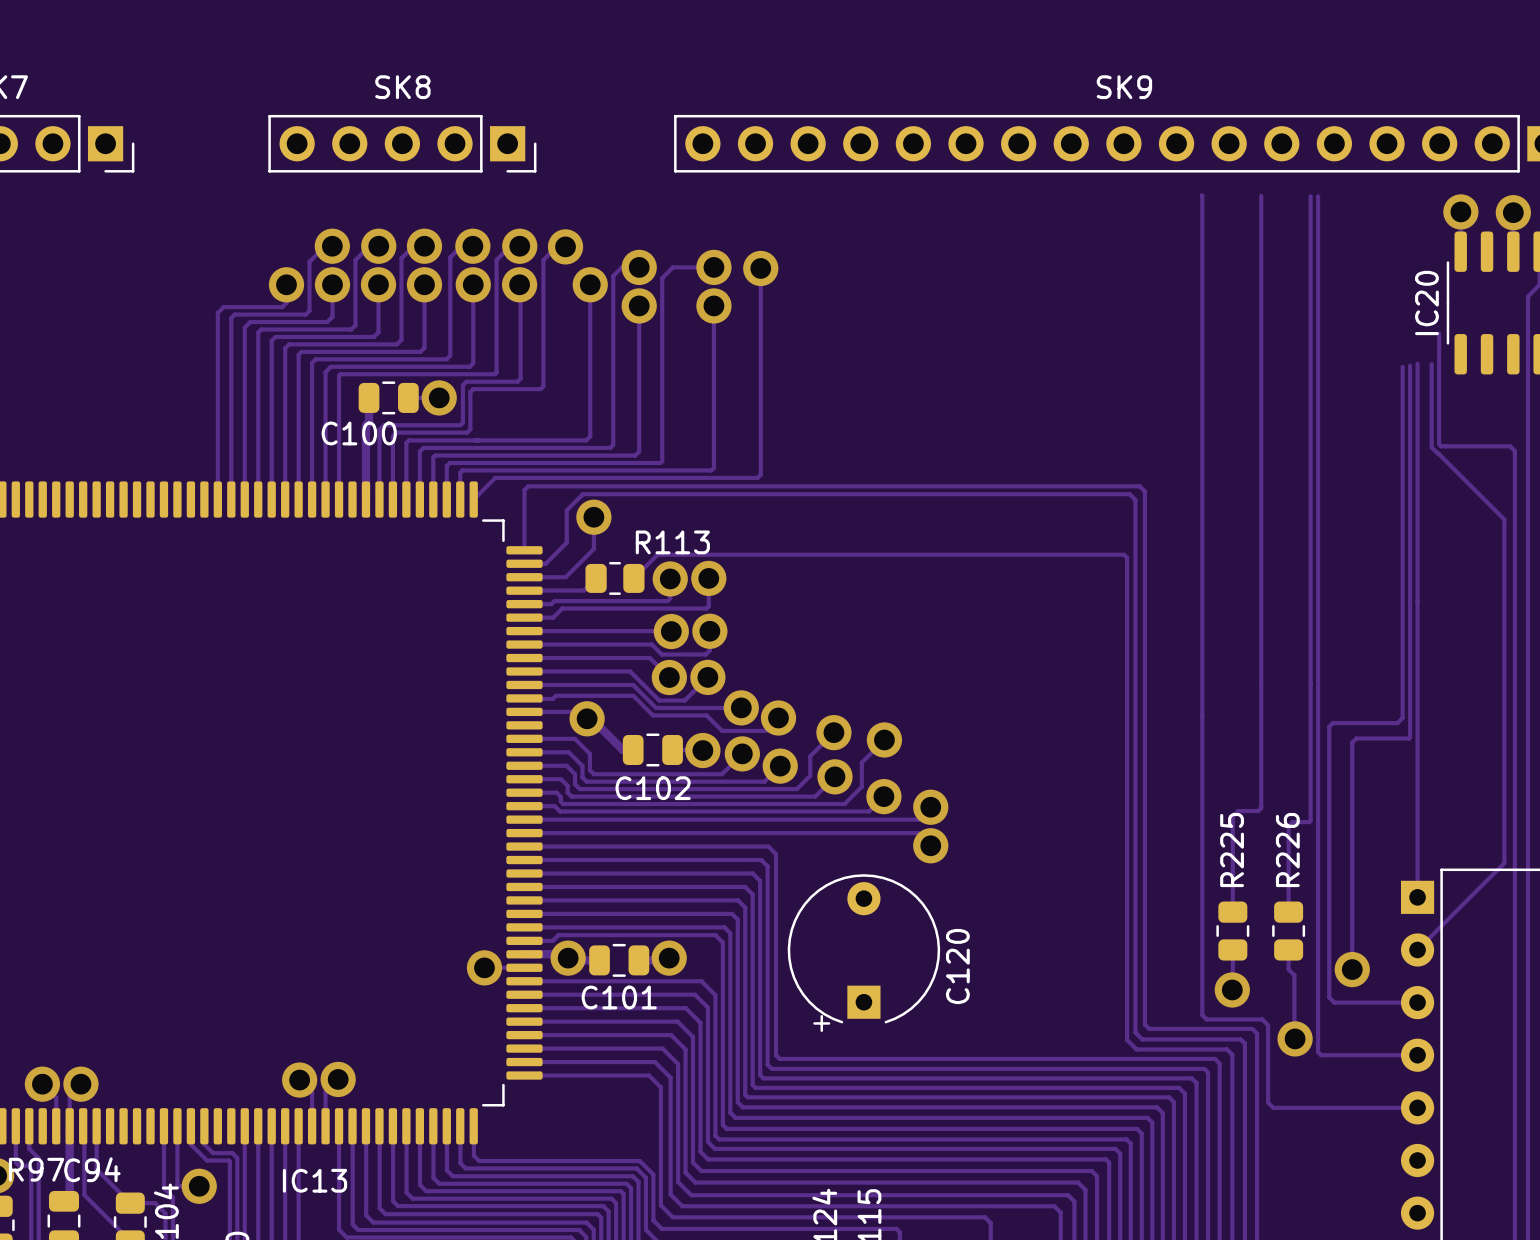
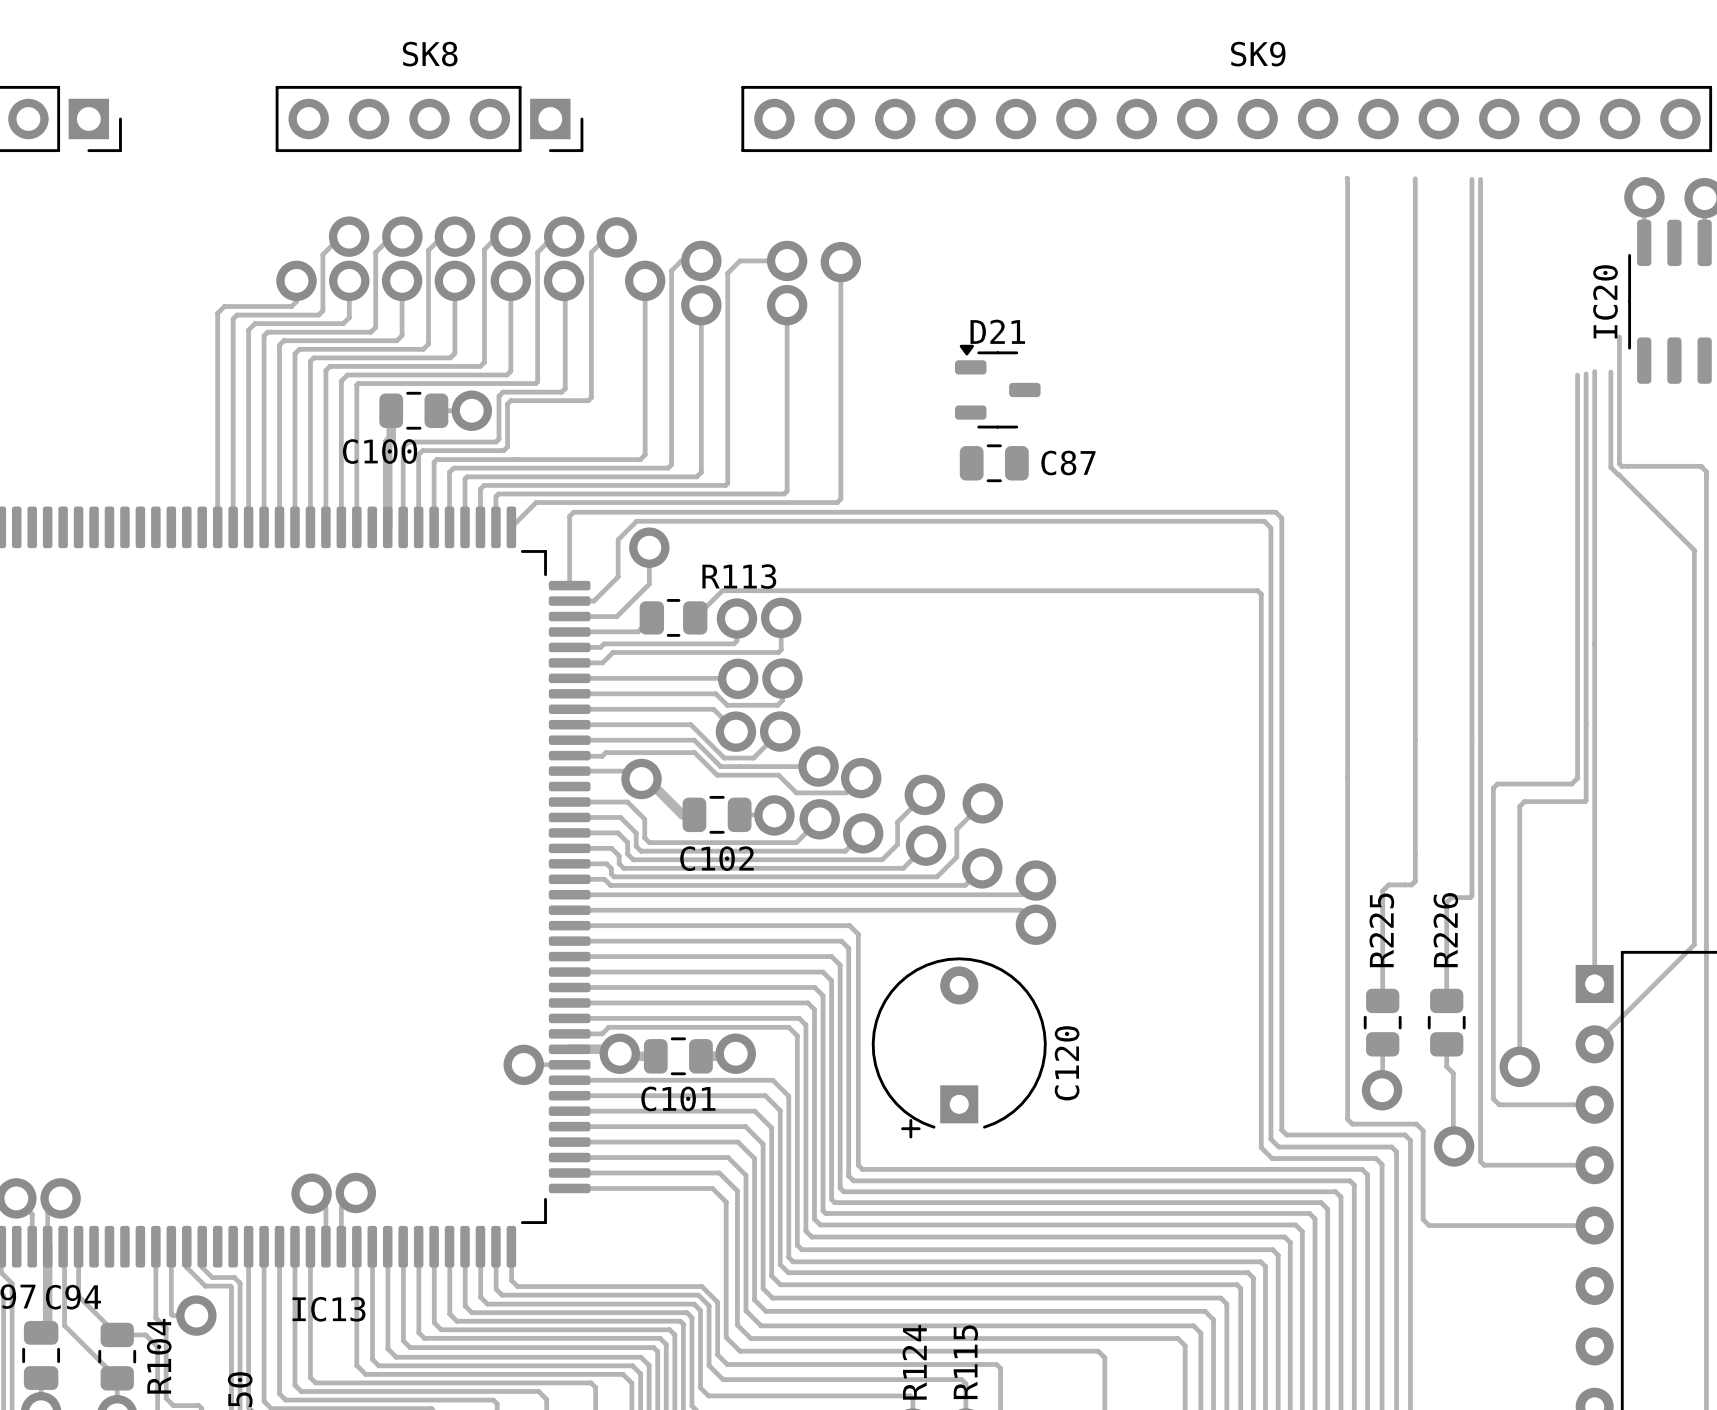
D21: none -> (997, 386)
C87: none -> (994, 463)

